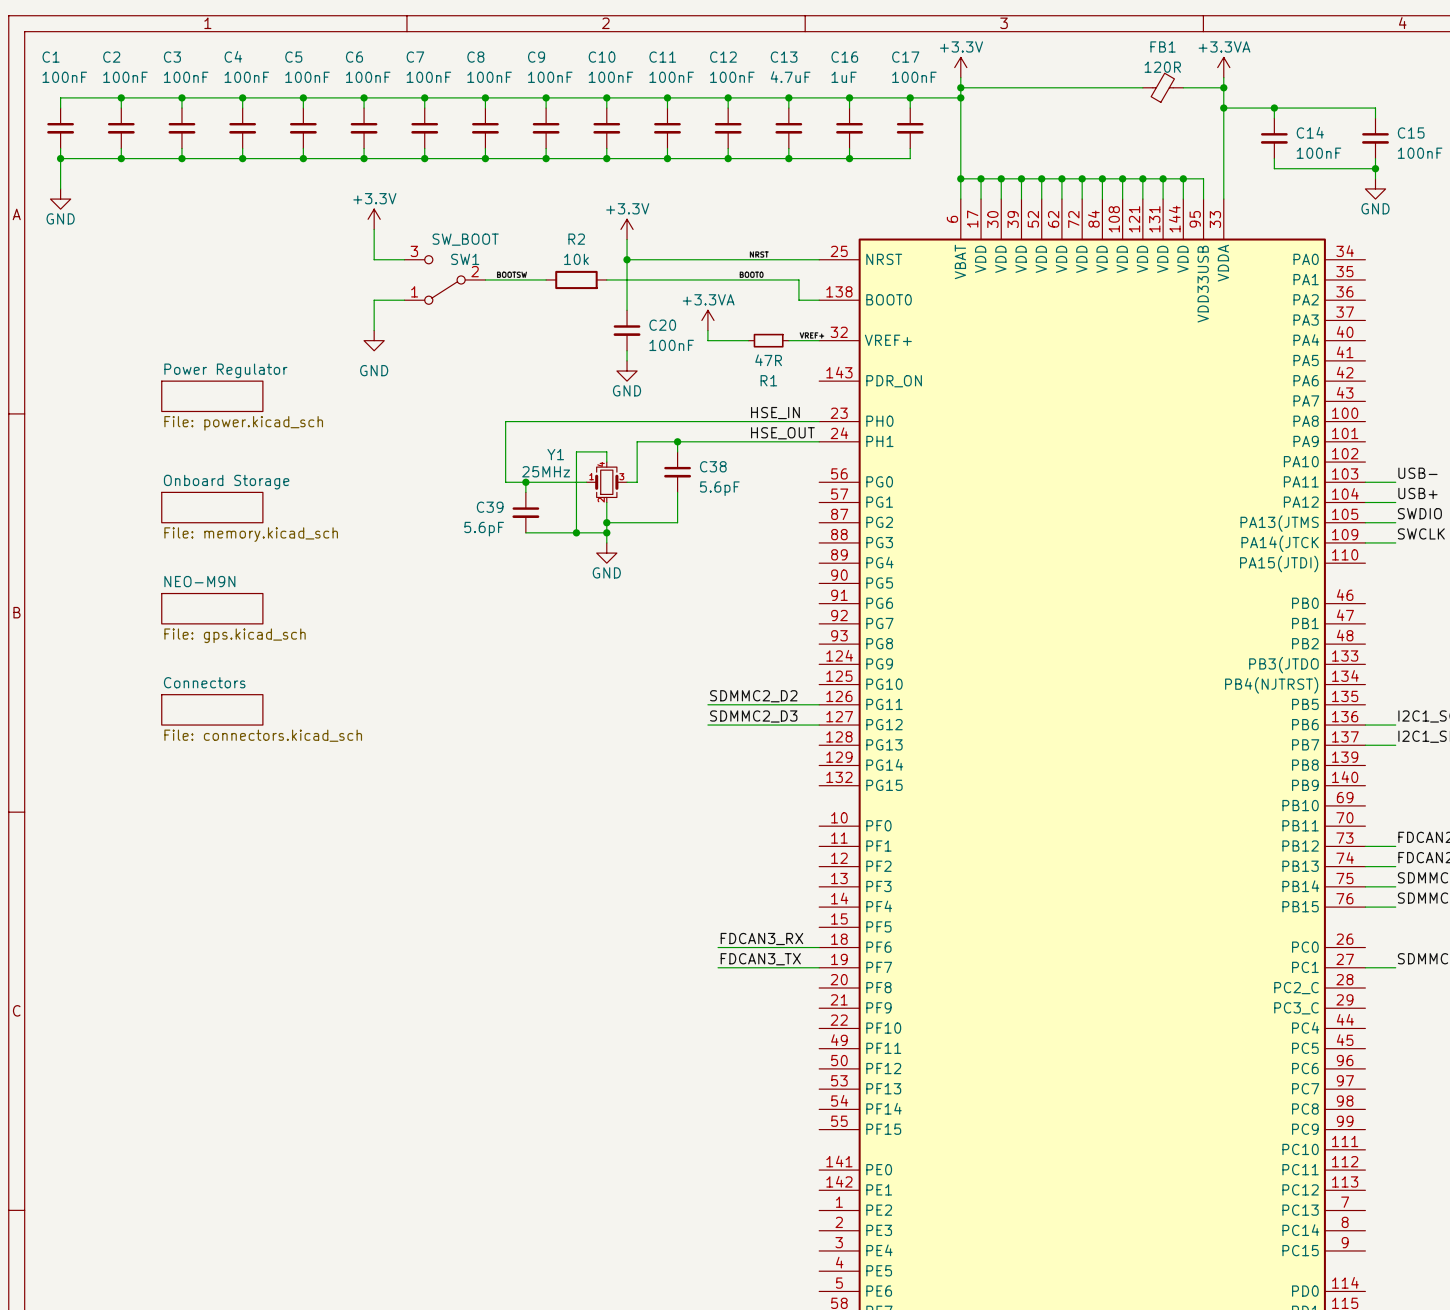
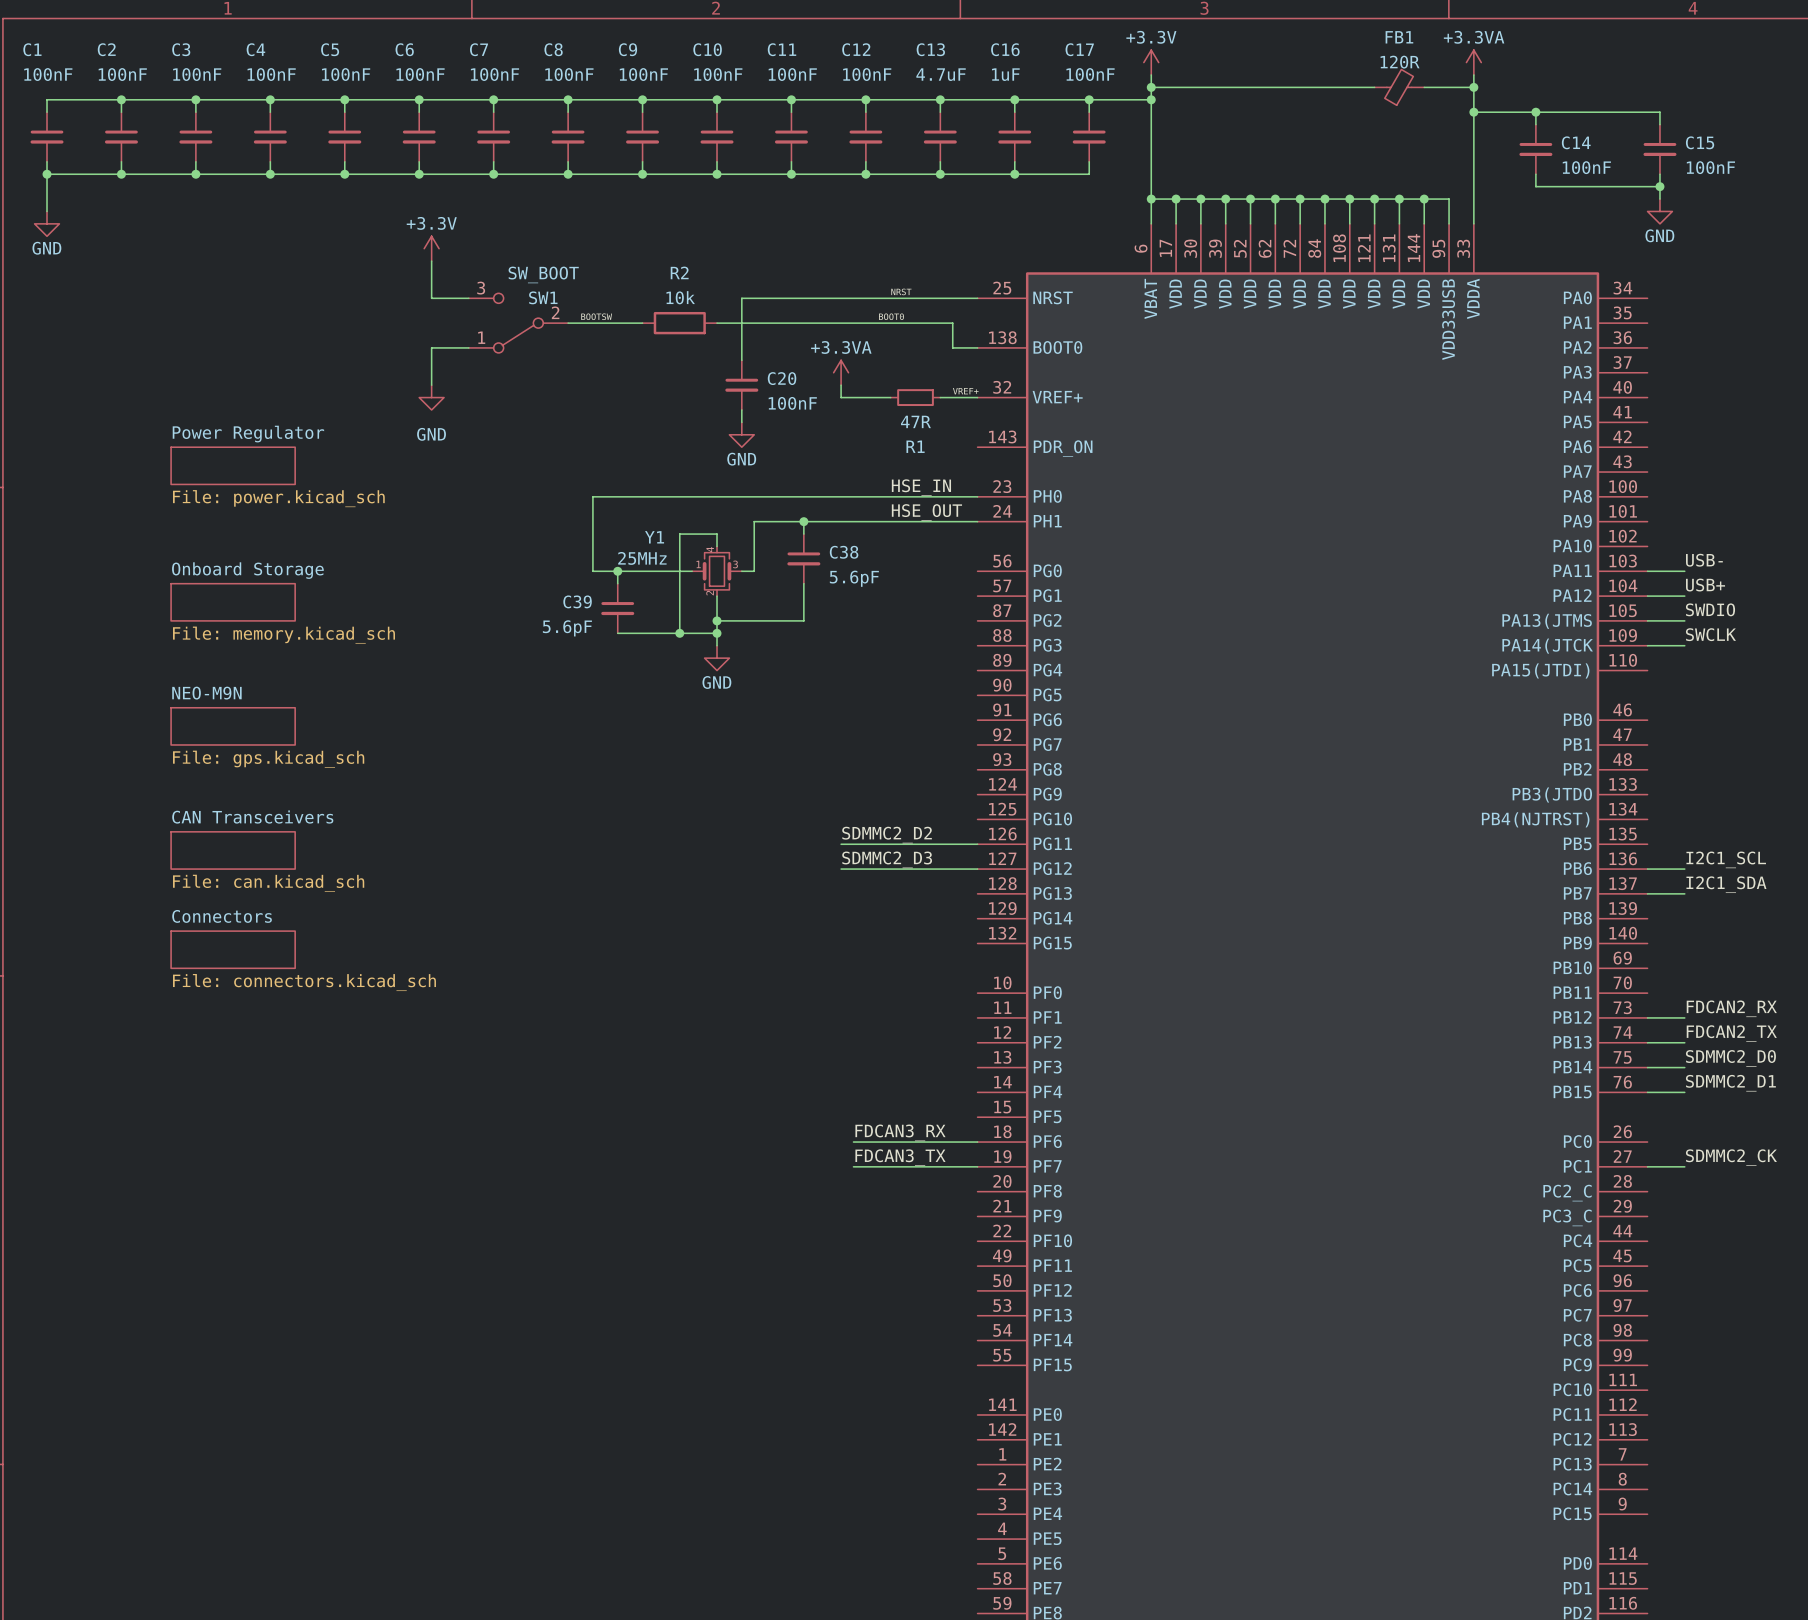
power symbol: +3.3V (627, 229) -> none
wire: (627, 239) (627, 259) -> none
junction: (627, 259) -> none
sheet Connectors name: Connectors (204, 682) -> CAN Transceivers (252, 817)
sheet Connectors value: File: connectors.kicad_sch (263, 735) -> File: can.kicad_sch (268, 883)
sheet Connectors: none -> File: connectors.kicad_sch (233, 949)

